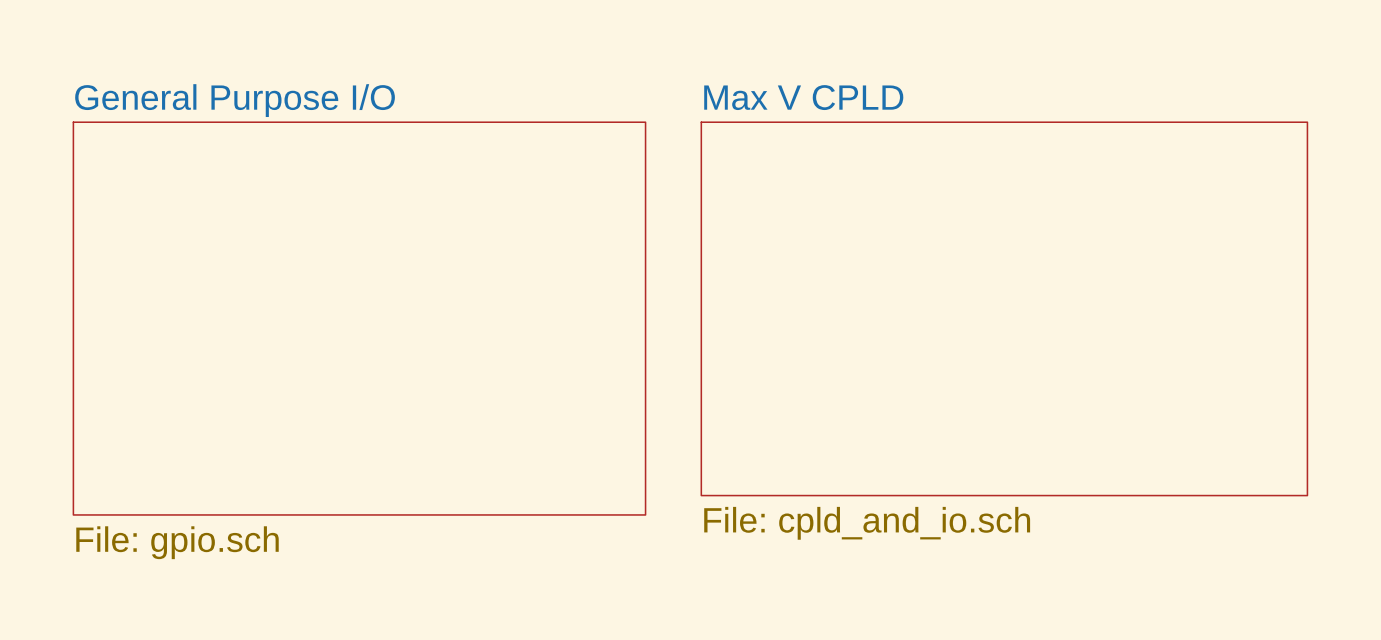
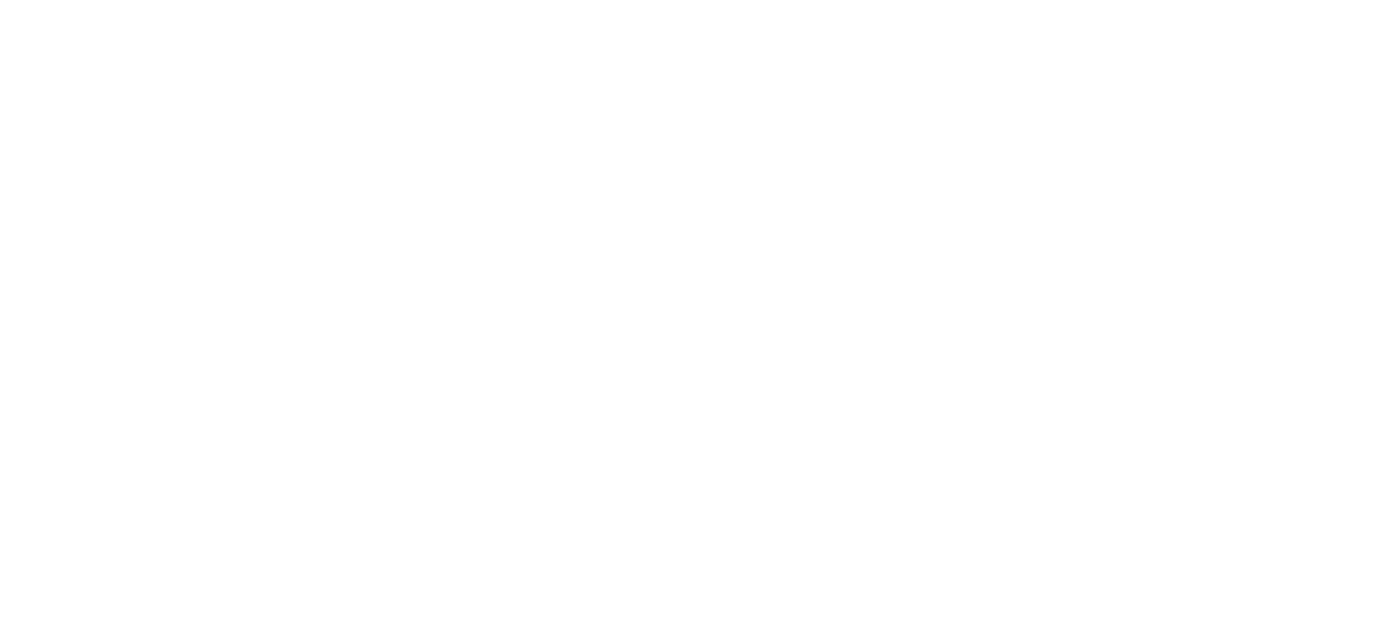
sheet Max V CPLD: File: cpld_and_io.sch (1004, 308) -> none
sheet General Purpose I/O: File: gpio.sch (359, 318) -> none

